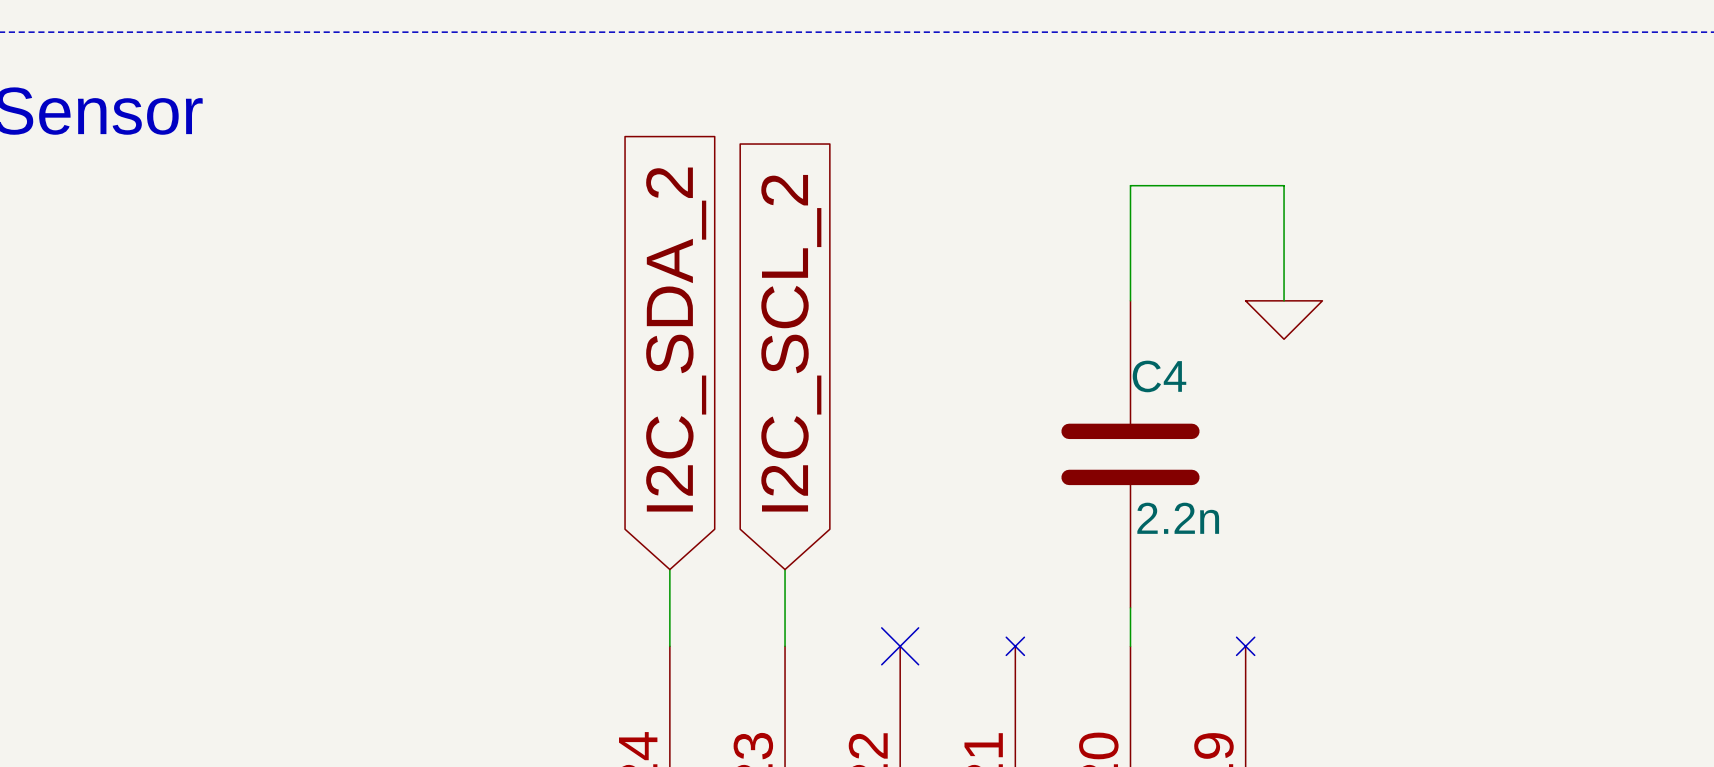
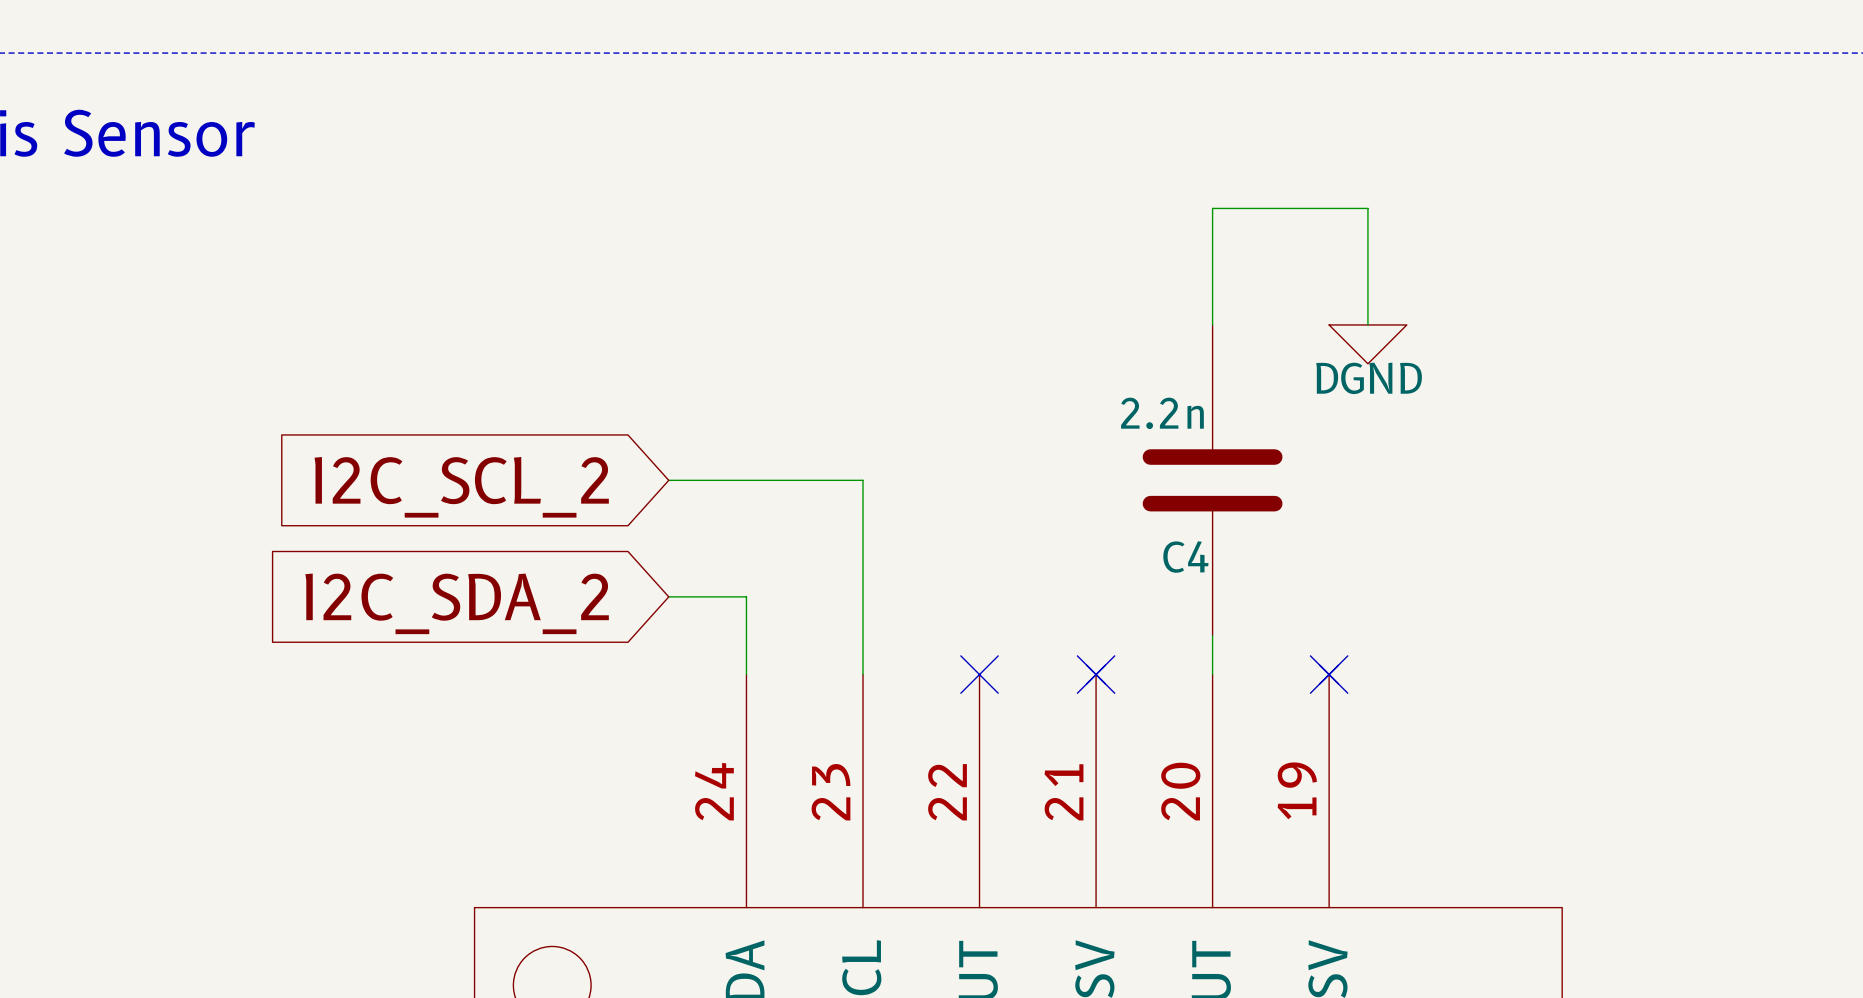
global label rotation: 0° (676, 339) -> 90° counterclockwise (457, 603)
global label rotation: 0° (791, 343) -> 90° counterclockwise (461, 487)
power symbol text: none -> DGND (1369, 378)
C4 name position: C4 (1159, 376) -> C4 (1185, 557)
wire: none -> (668, 480) (862, 480) (862, 596)
C4 value position: 2.2n (1178, 518) -> 2.2n (1162, 413)
wire: none -> (668, 596) (746, 596)
no-connect mark: none -> (1096, 674)
no-connect mark: none -> (1329, 674)

